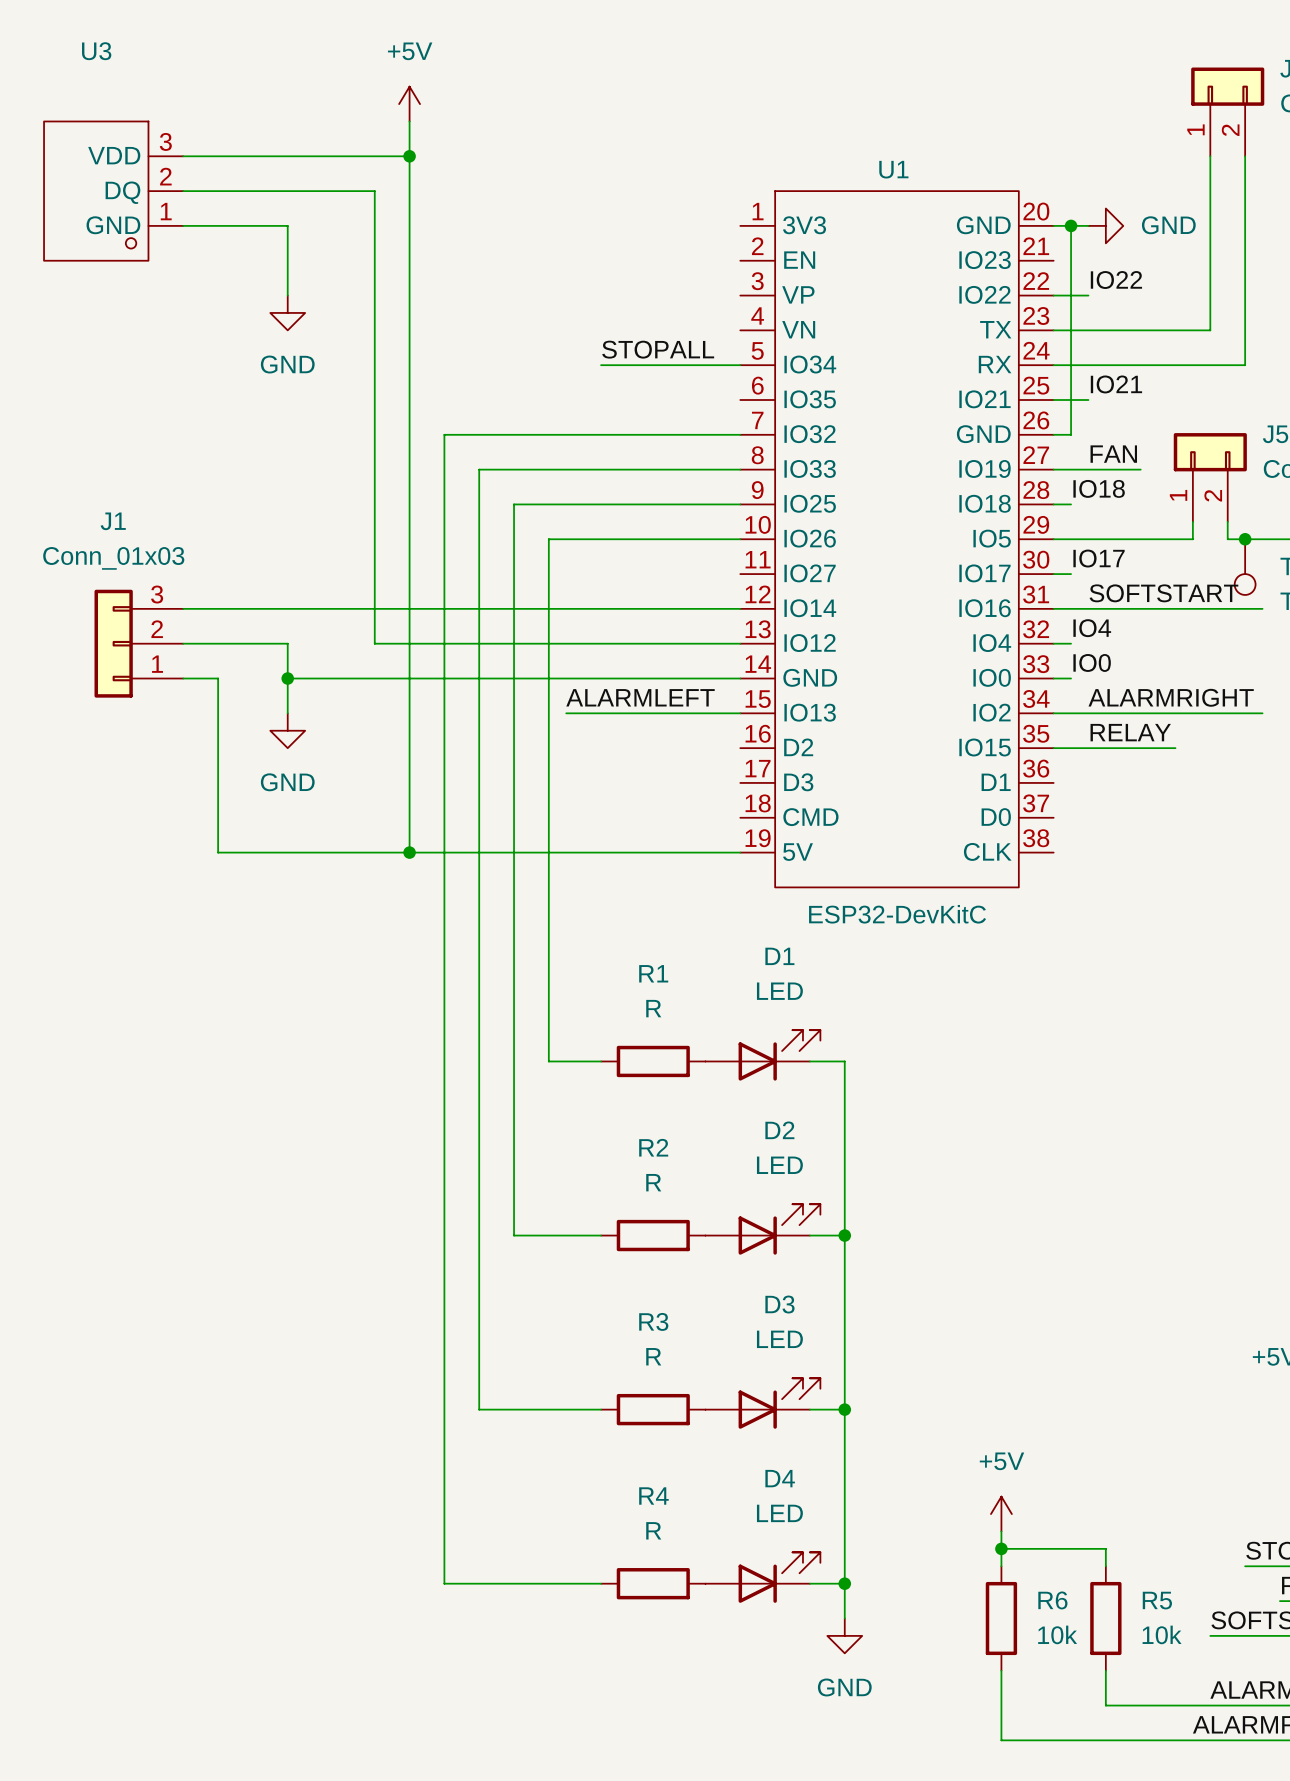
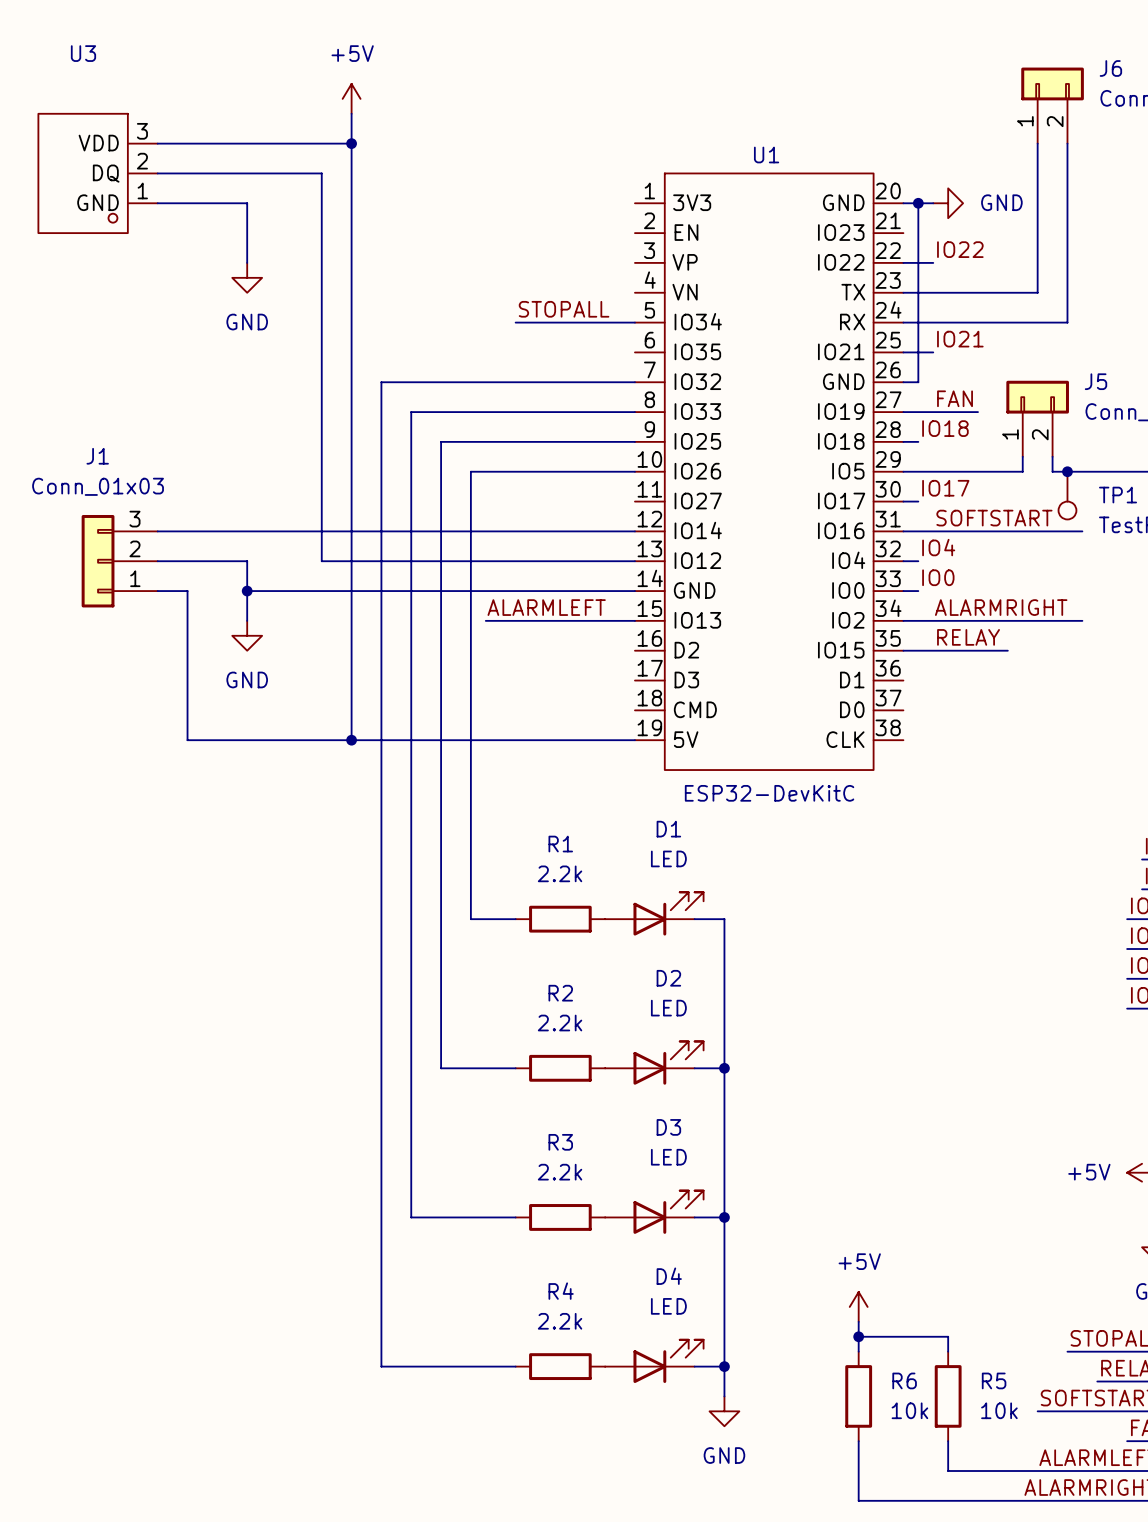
R1 value: R (653, 1008) -> 2.2k (560, 873)
R2 value: R (653, 1182) -> 2.2k (560, 1023)
R3 value: R (653, 1356) -> 2.2k (560, 1172)
R4 value: R (653, 1530) -> 2.2k (560, 1321)

